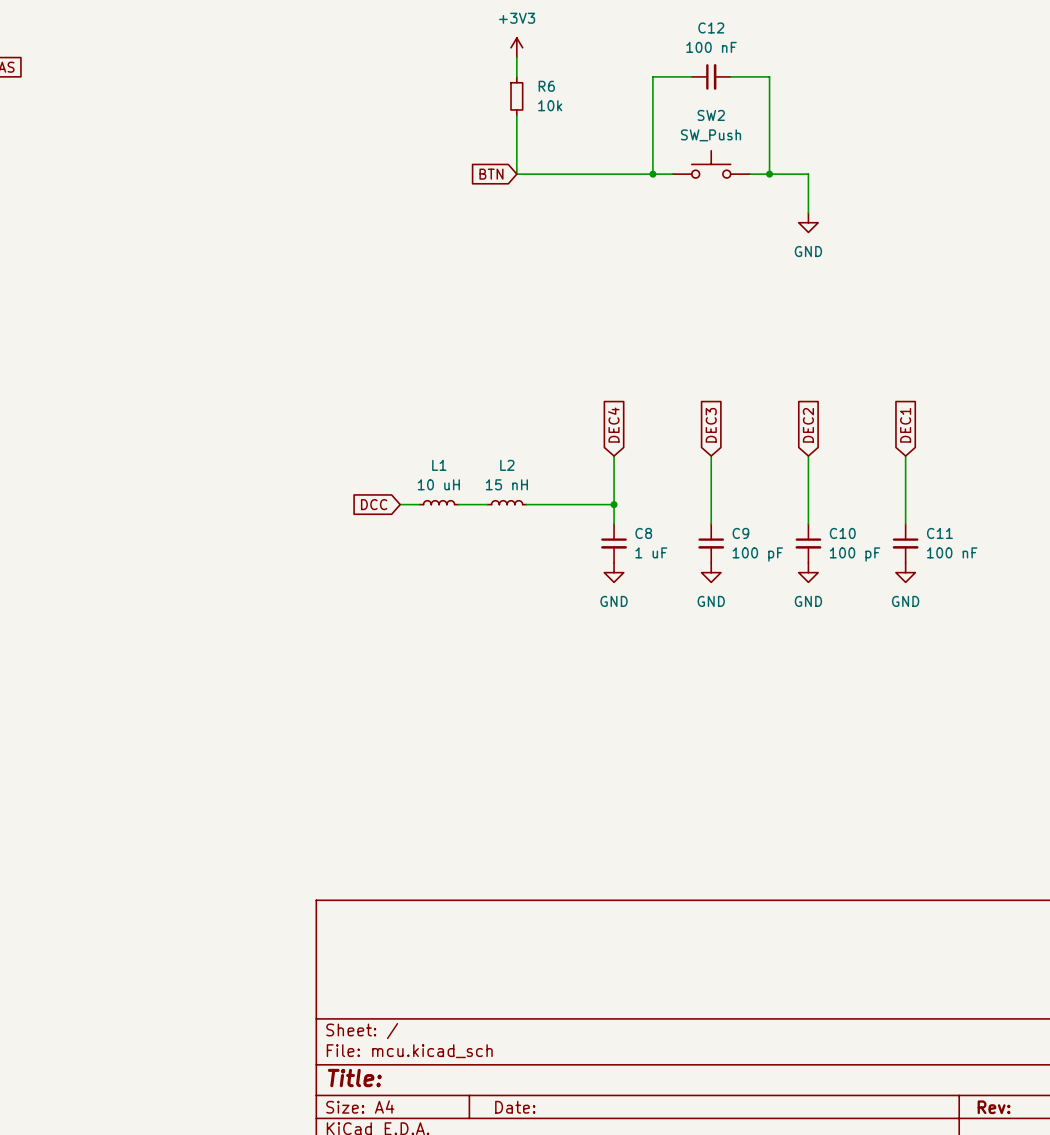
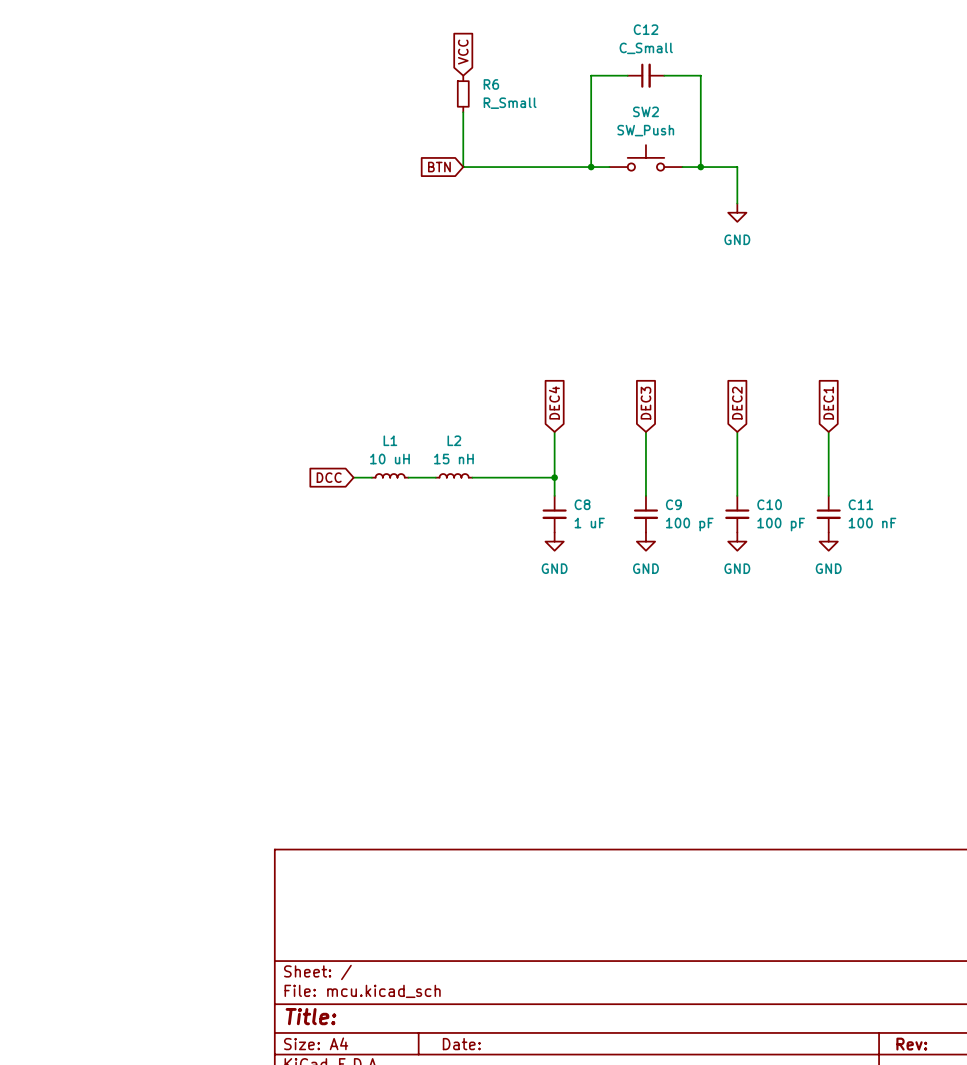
power symbol: +3V3 (516, 47) -> none
C12 value: 100 nF (711, 47) -> C_Small (646, 48)
global label: none -> VCC (463, 52)
wire: (516, 57) (516, 76) -> none
R6 value: 10k (550, 105) -> R_Small (510, 103)

